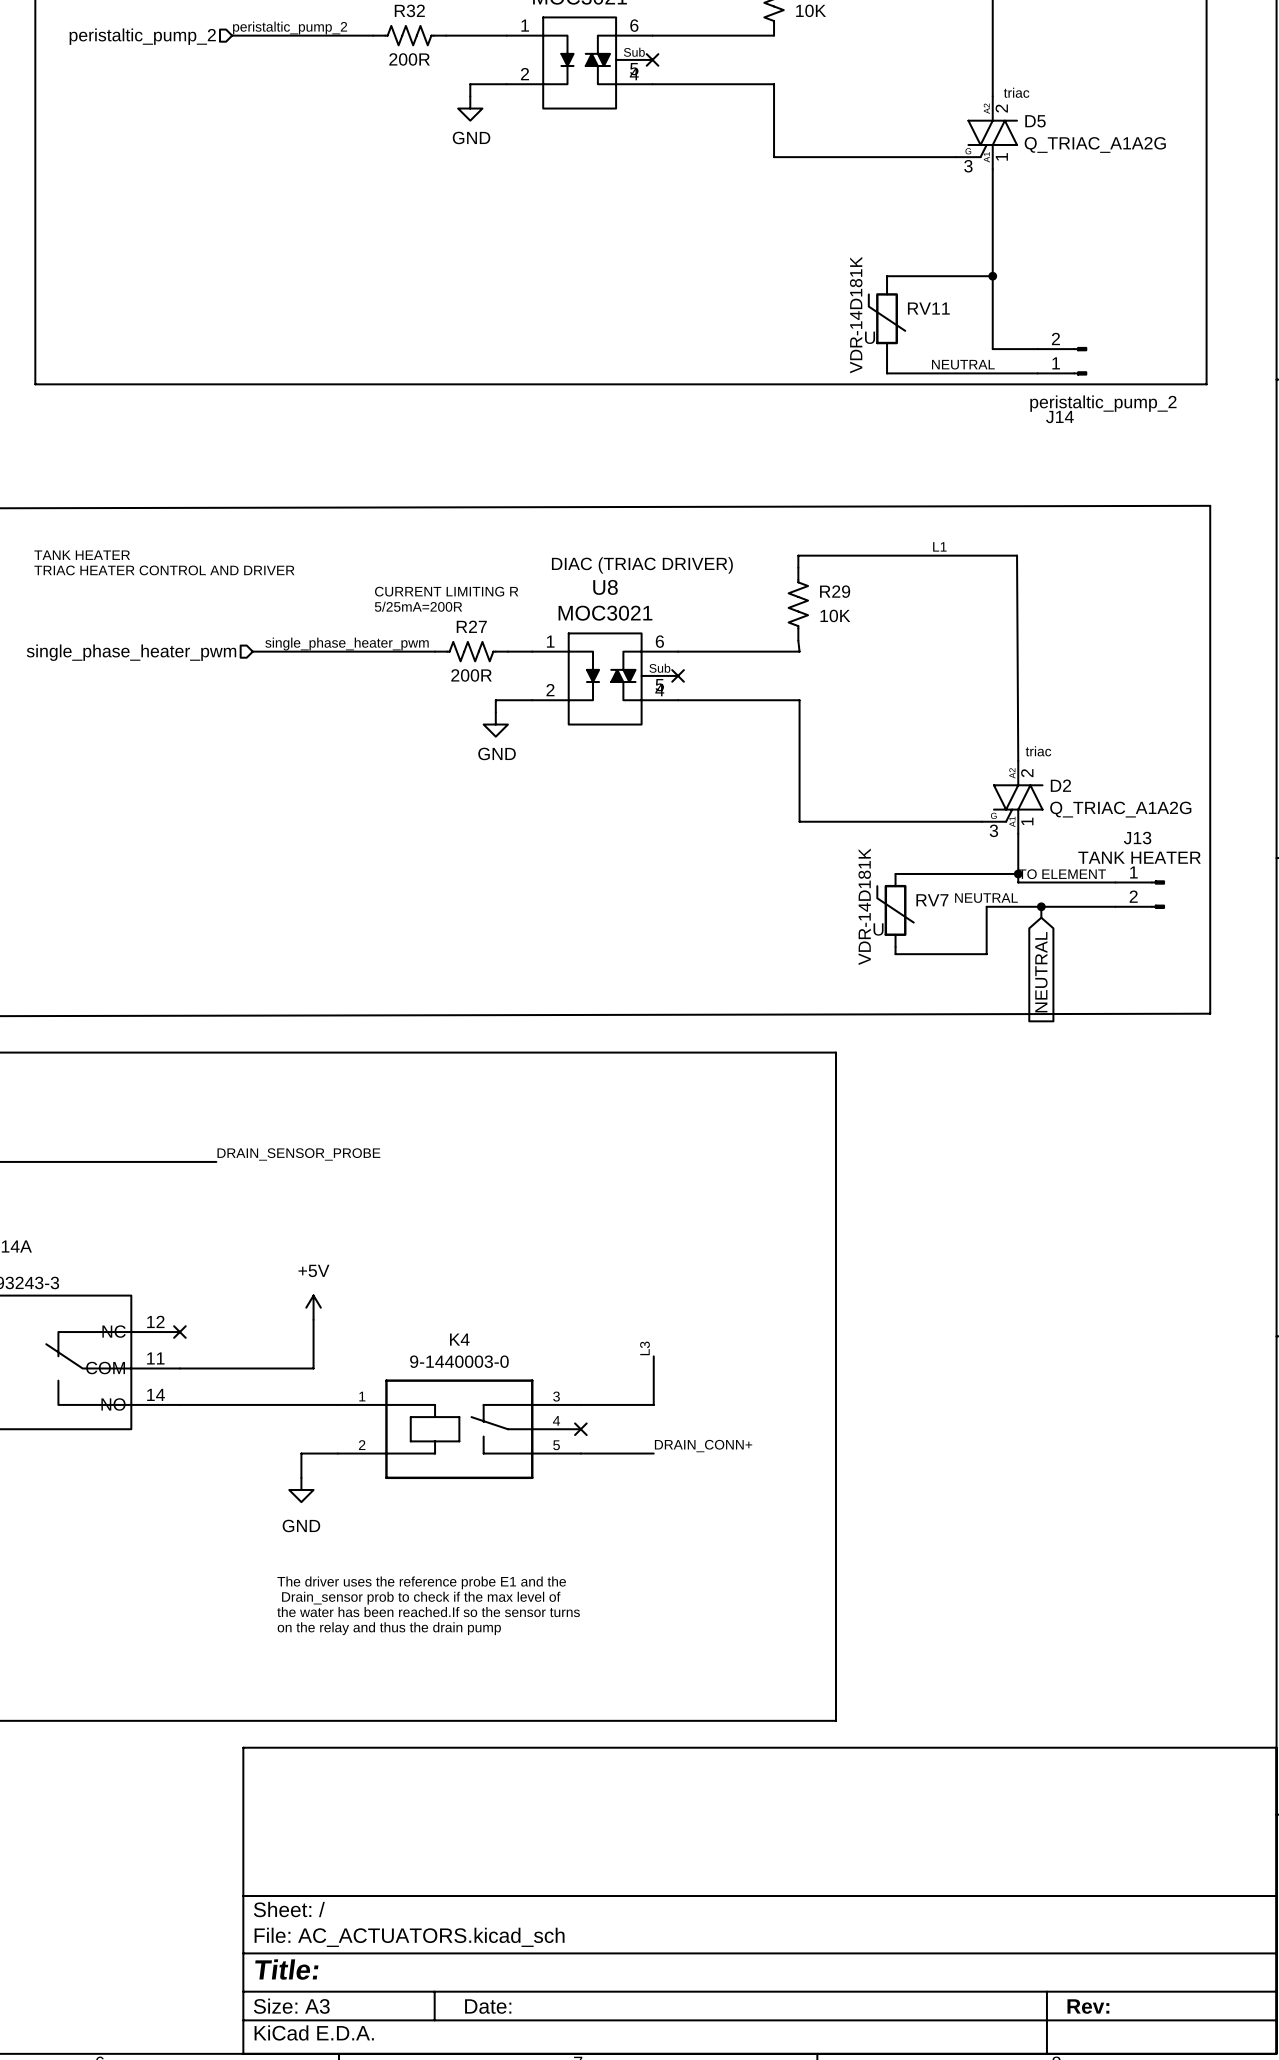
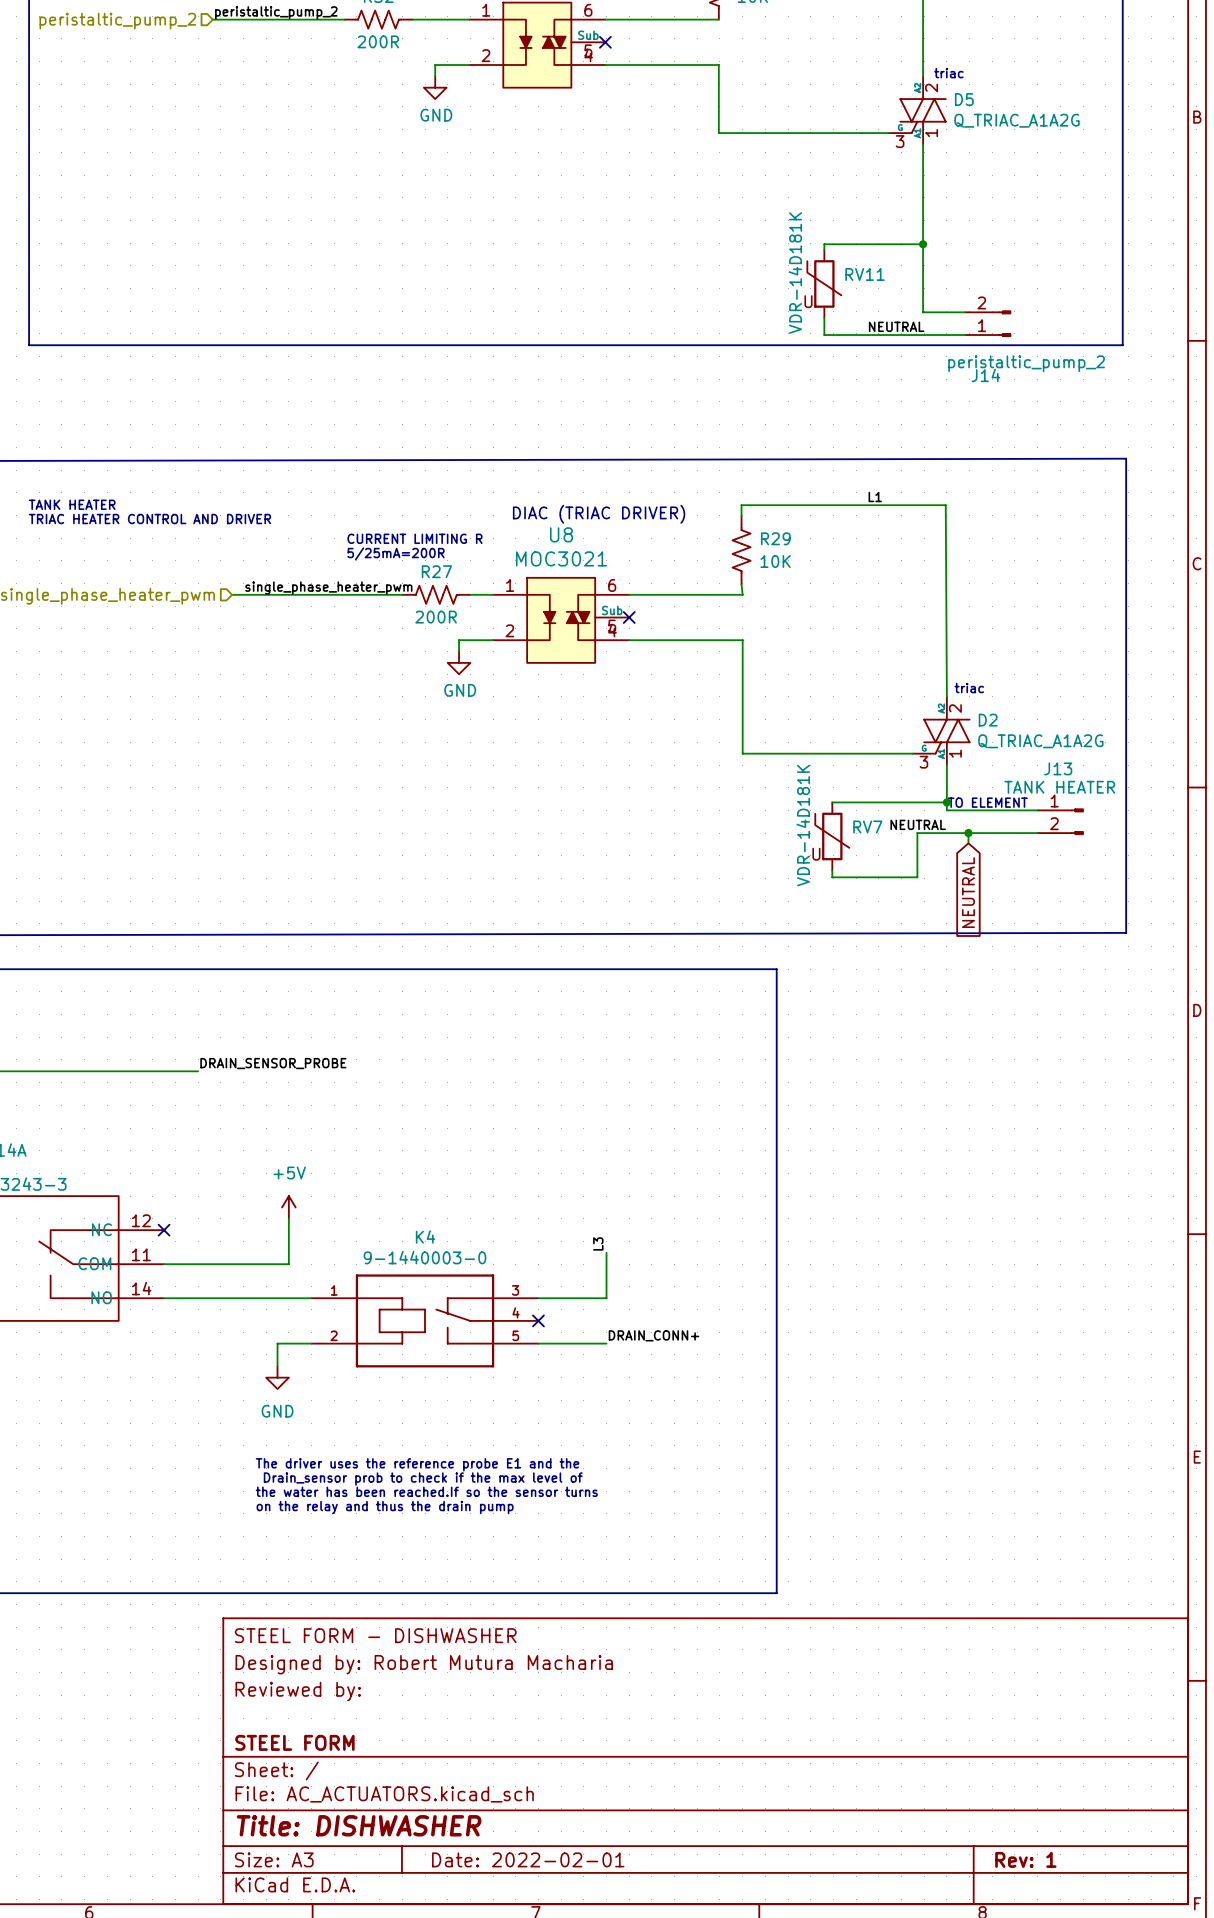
title block: none -> STEEL FORM - DISHWASHER (375, 1635)
title block: none -> Designed by: Robert Mutura Macharia (424, 1664)
title block: none -> Reviewed by: (298, 1691)
title block: none -> STEEL FORM (294, 1742)
title block: Title: (286, 1969) -> Title: DISHWASHER (359, 1825)
title block: Date: (488, 2006) -> Date: 2022-02-01 (528, 1859)
title block: Rev: (1088, 2006) -> Rev: 1 (1025, 1859)

